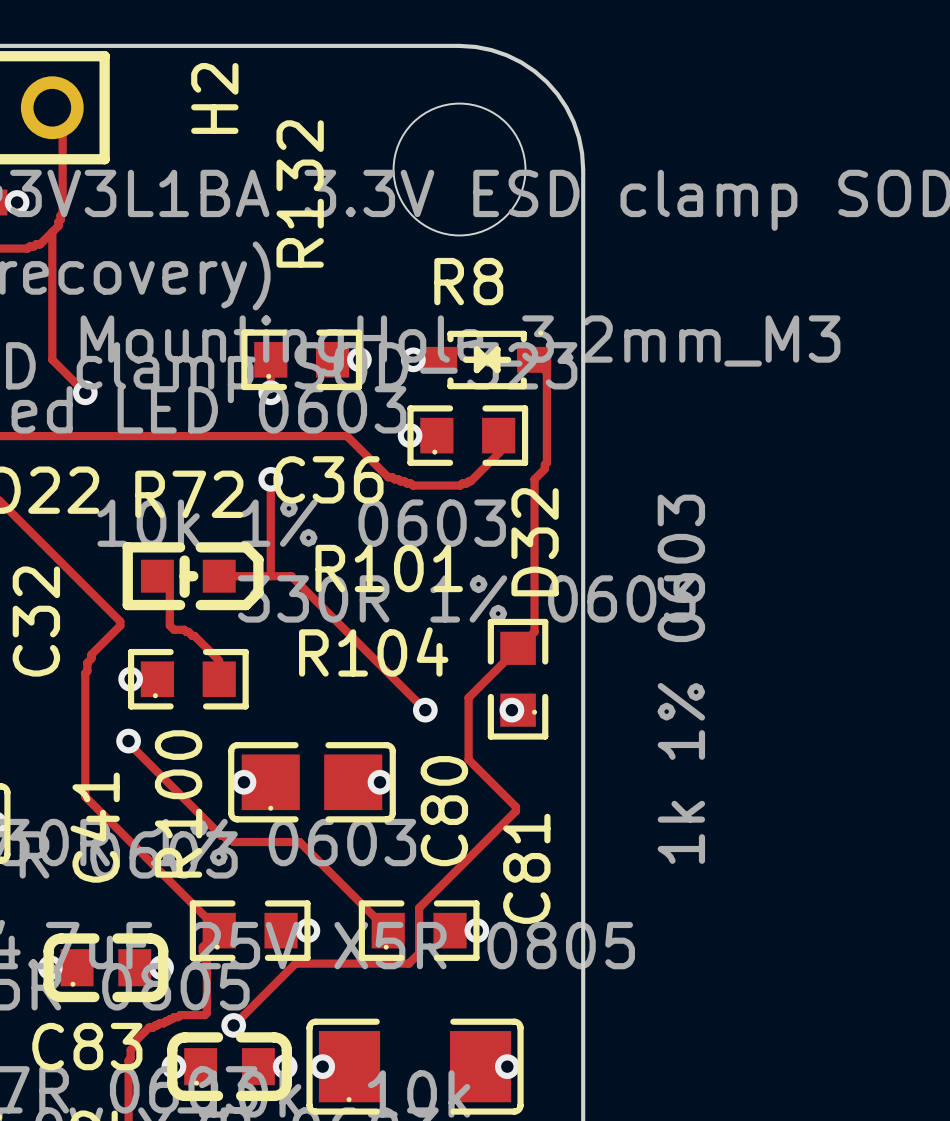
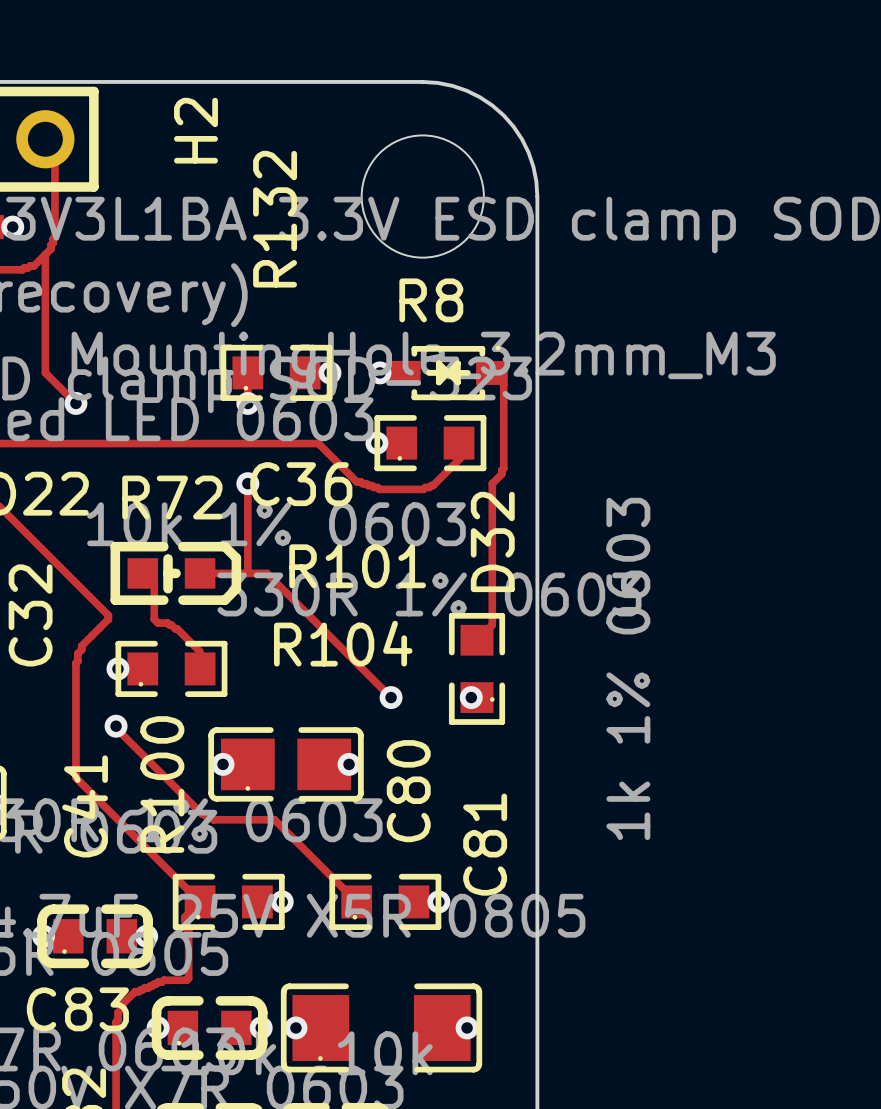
track: (518, 648) (468, 697) (468, 759) (516, 807) (516, 811) (419, 907) (419, 953) (408, 963) (295, 963) (233, 1025) -> none
via: (233, 1025) -> none

